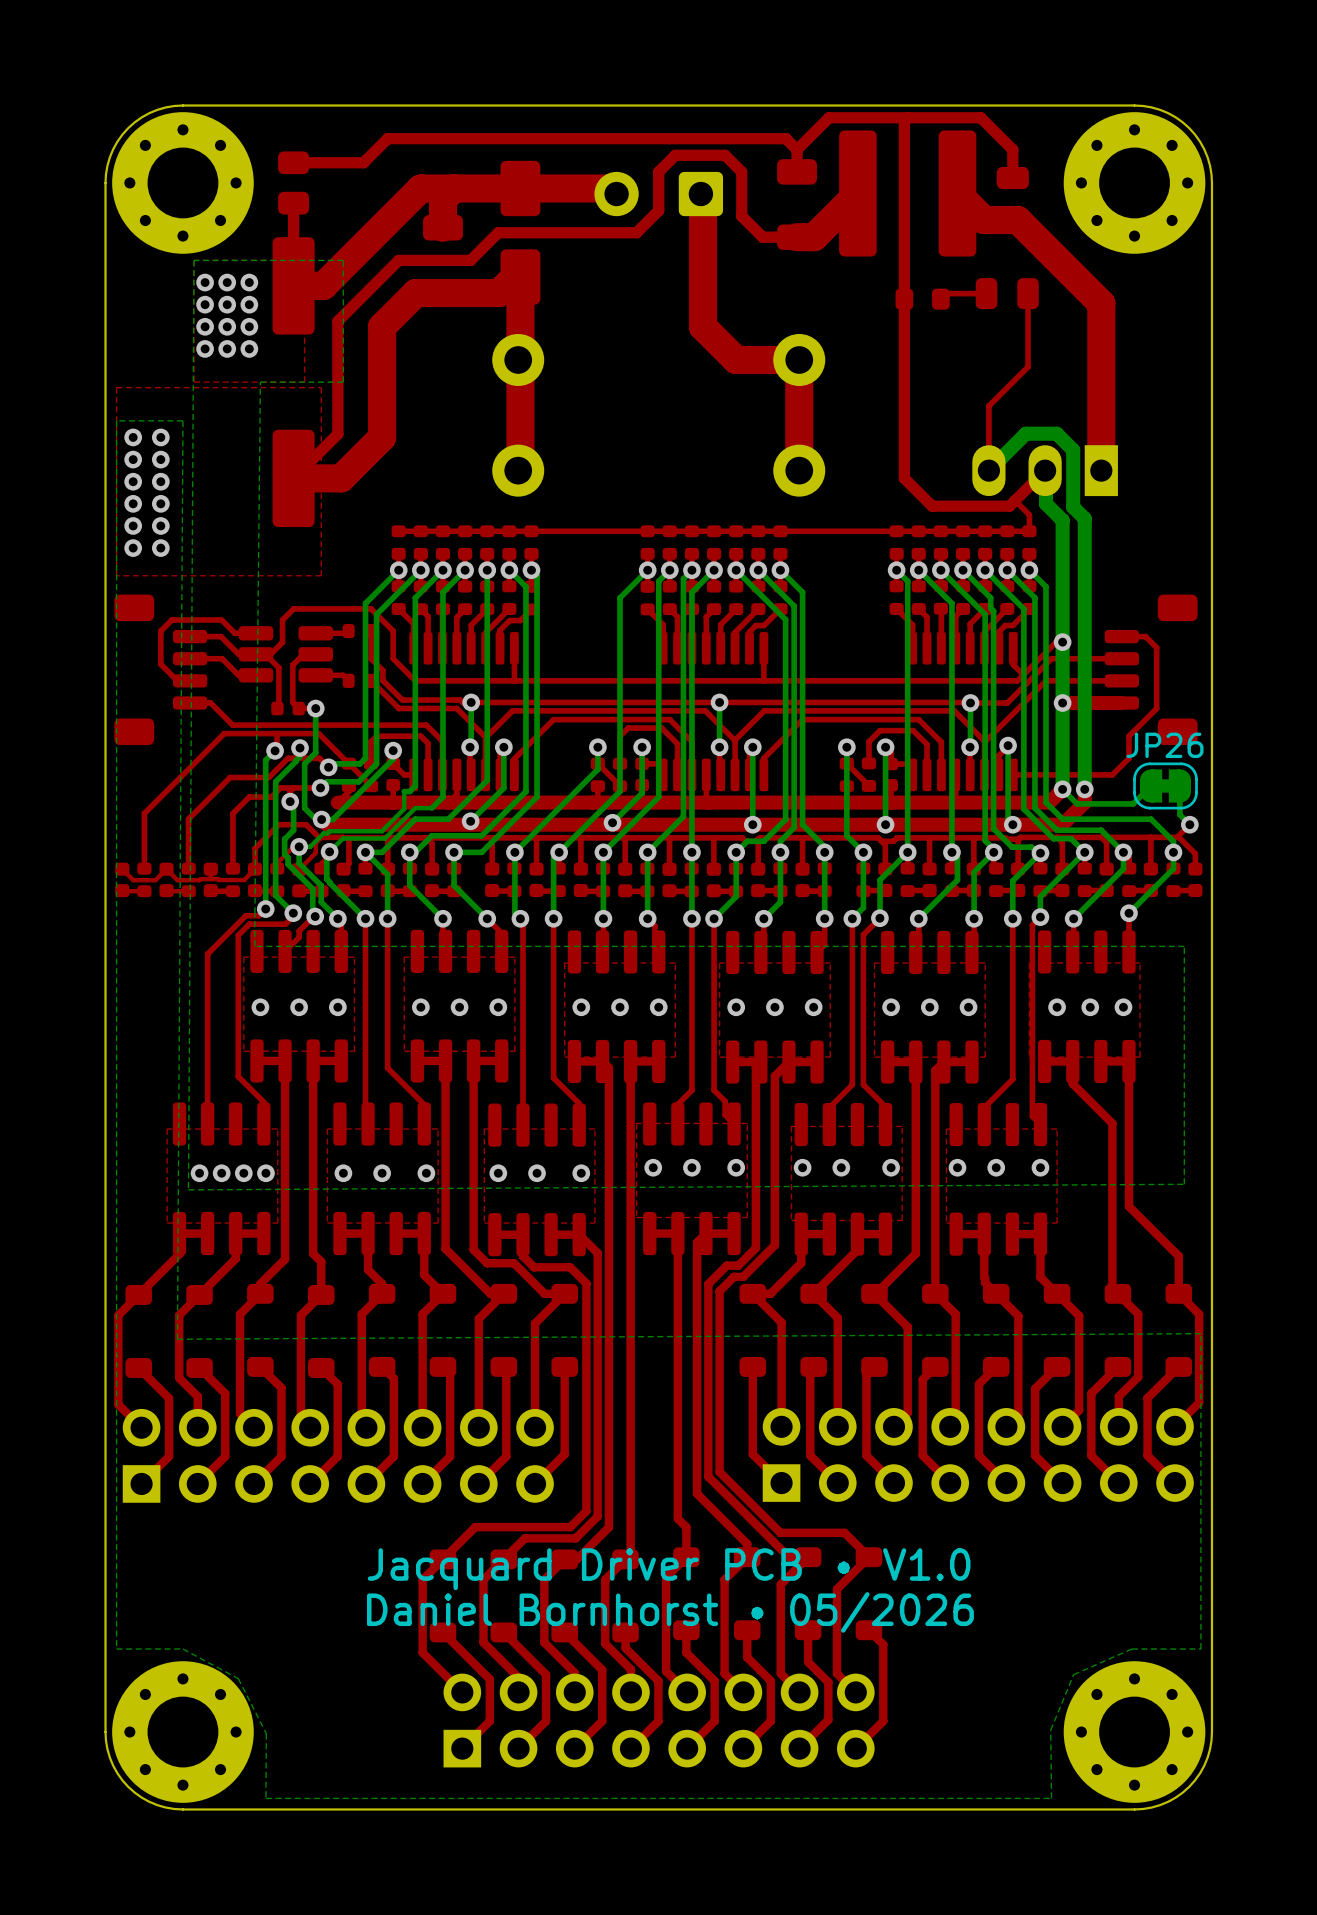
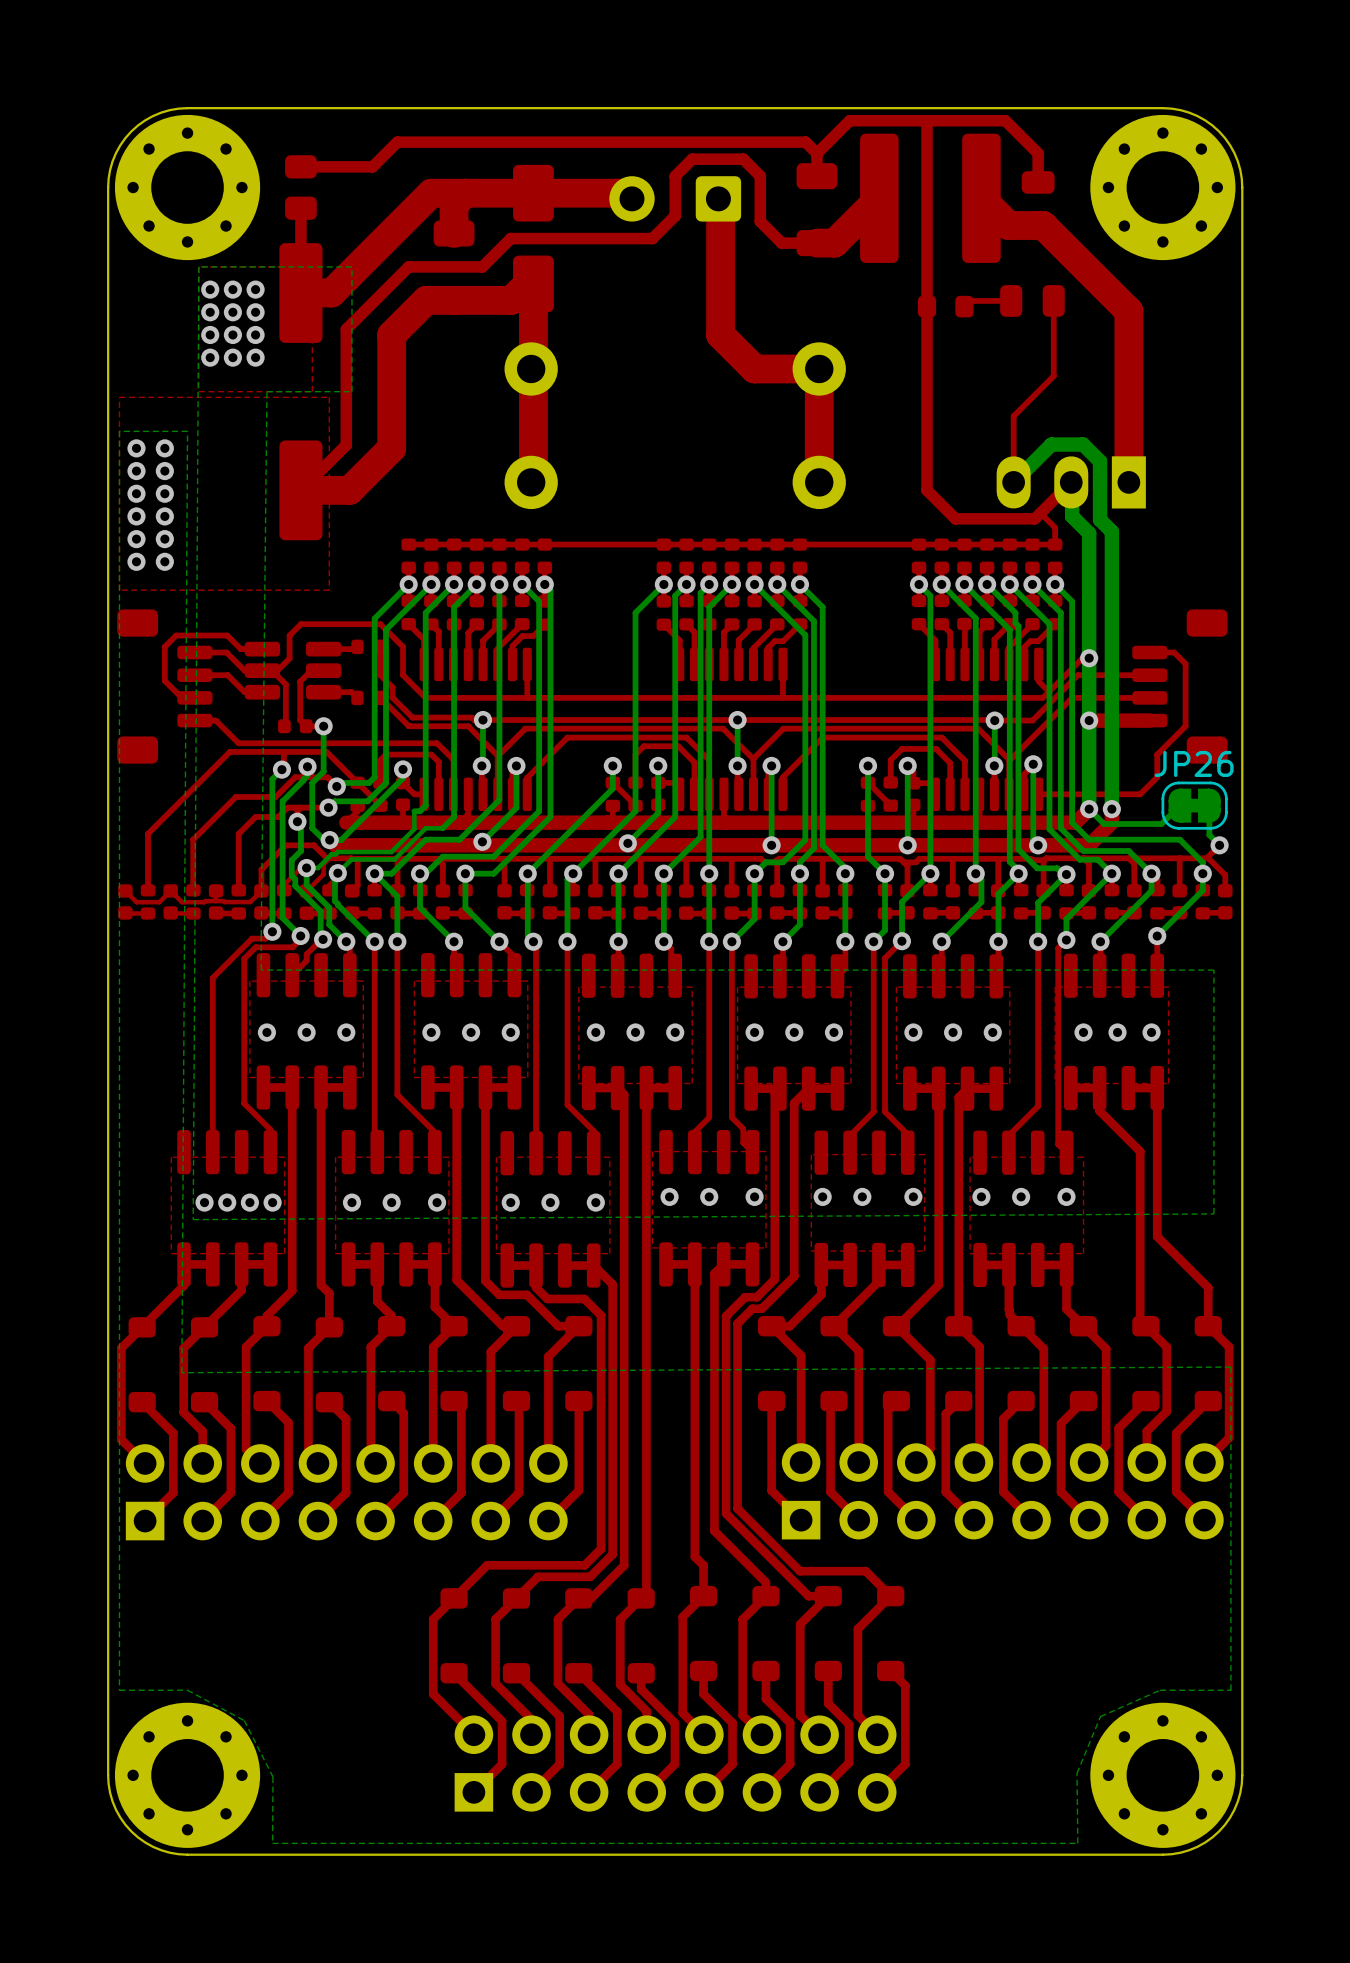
text: Jacquard Driver PCB • V1.0 (669, 1569) -> none
text: Daniel Bornhorst • 05/2026 (670, 1612) -> none

